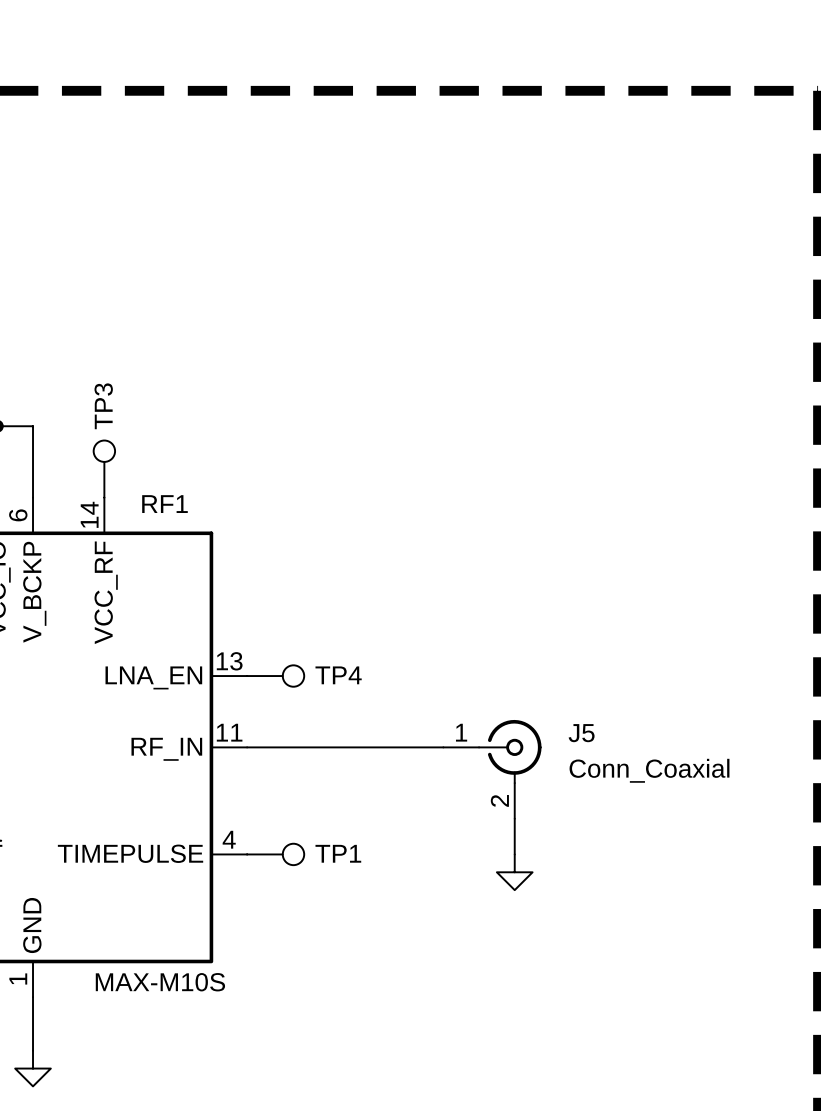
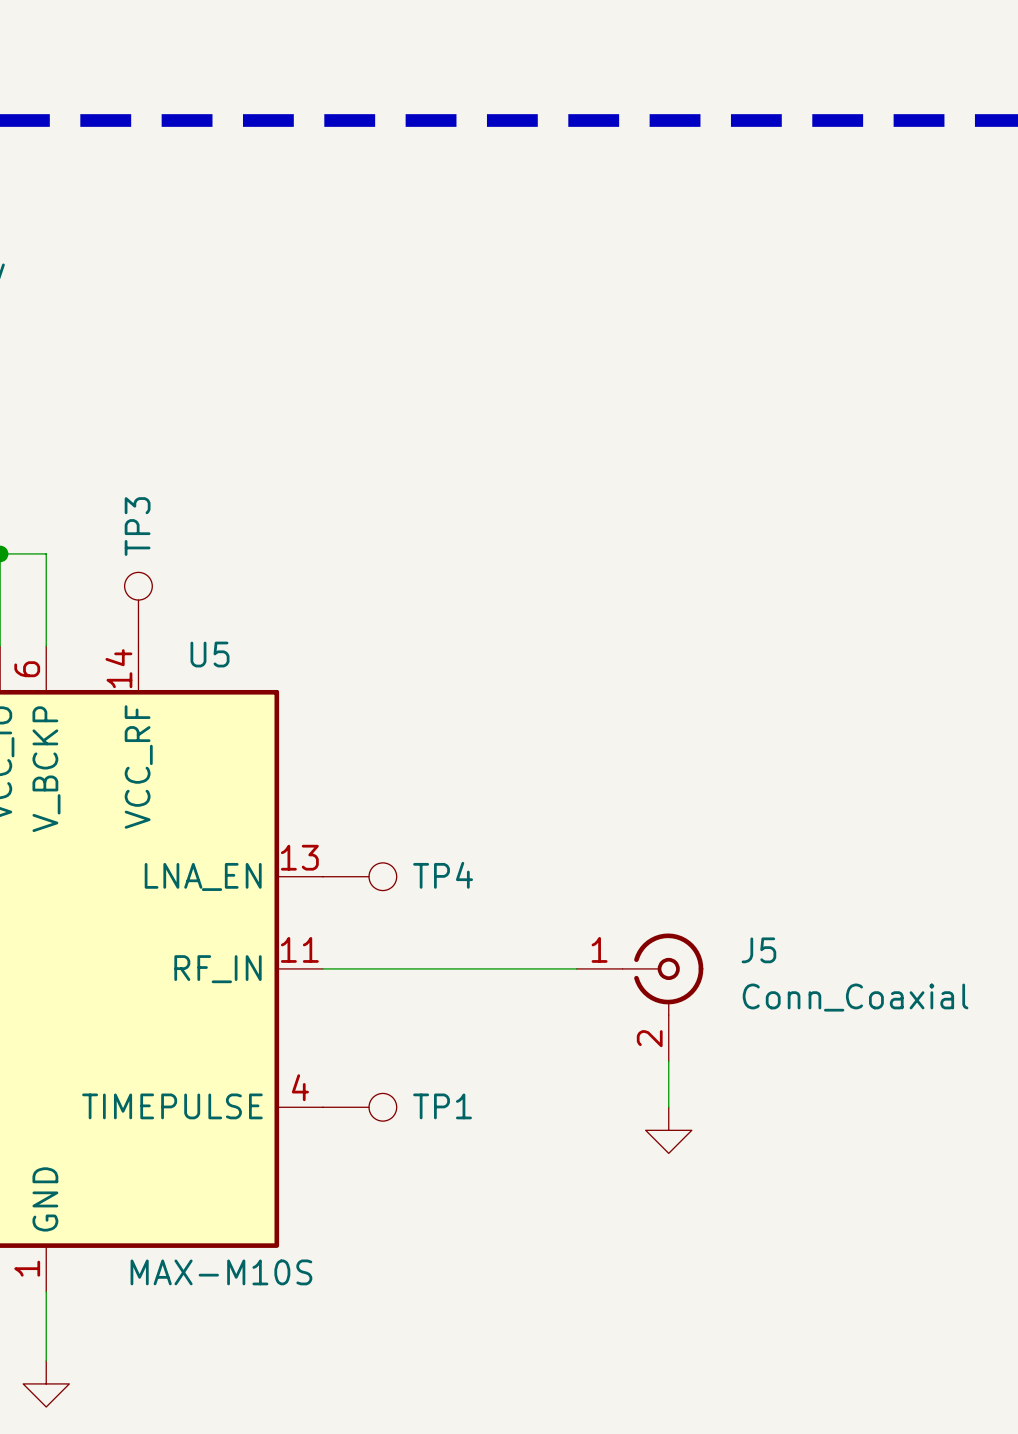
RF1 name: RF1 (164, 504) -> U5 (210, 654)

